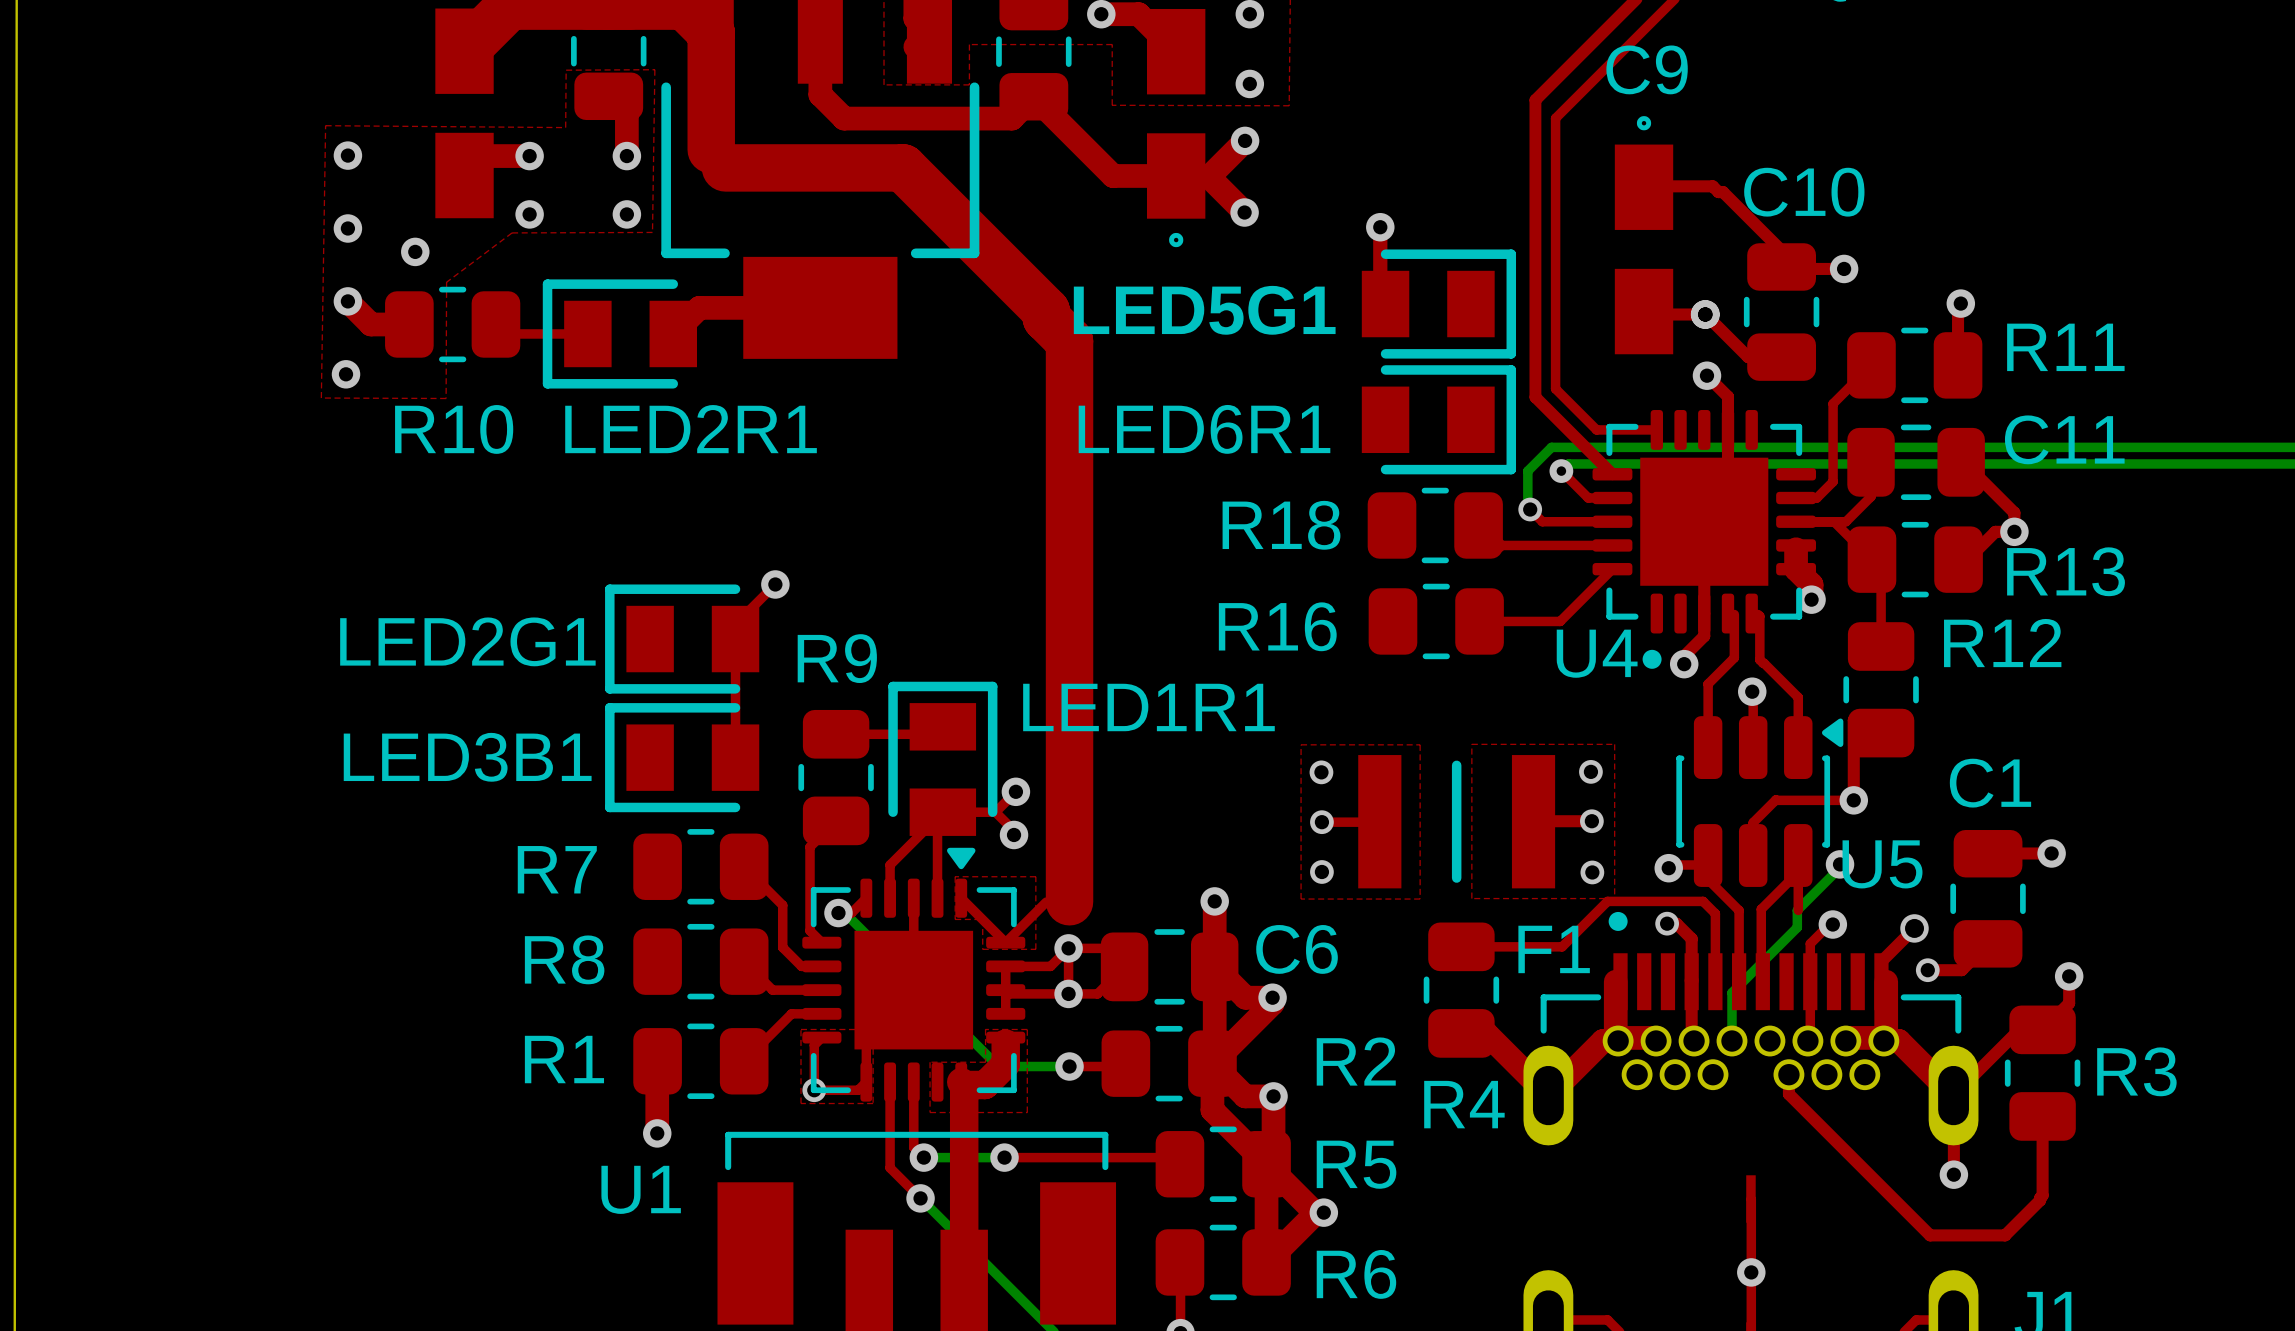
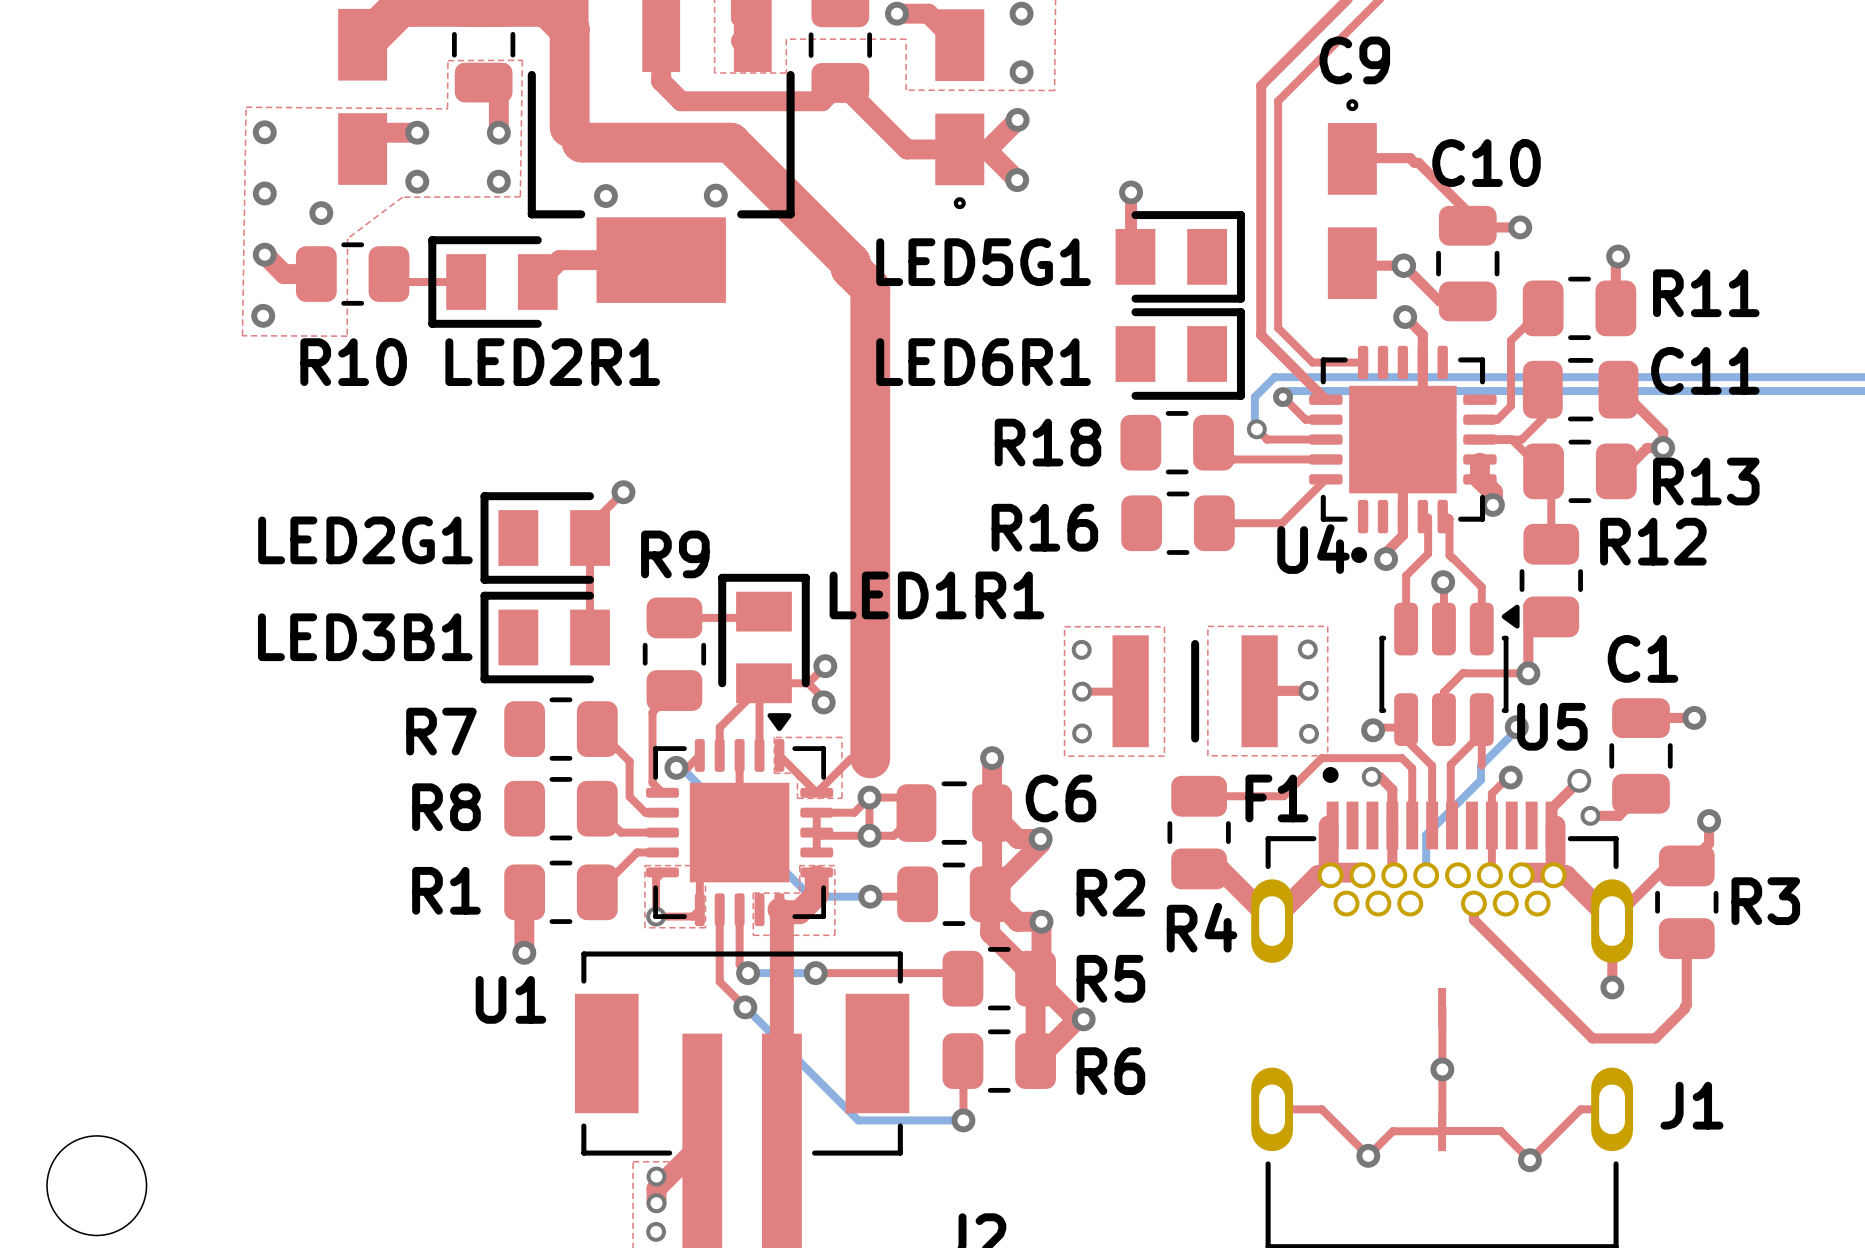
via: none -> (605, 196)
via: none -> (715, 195)

